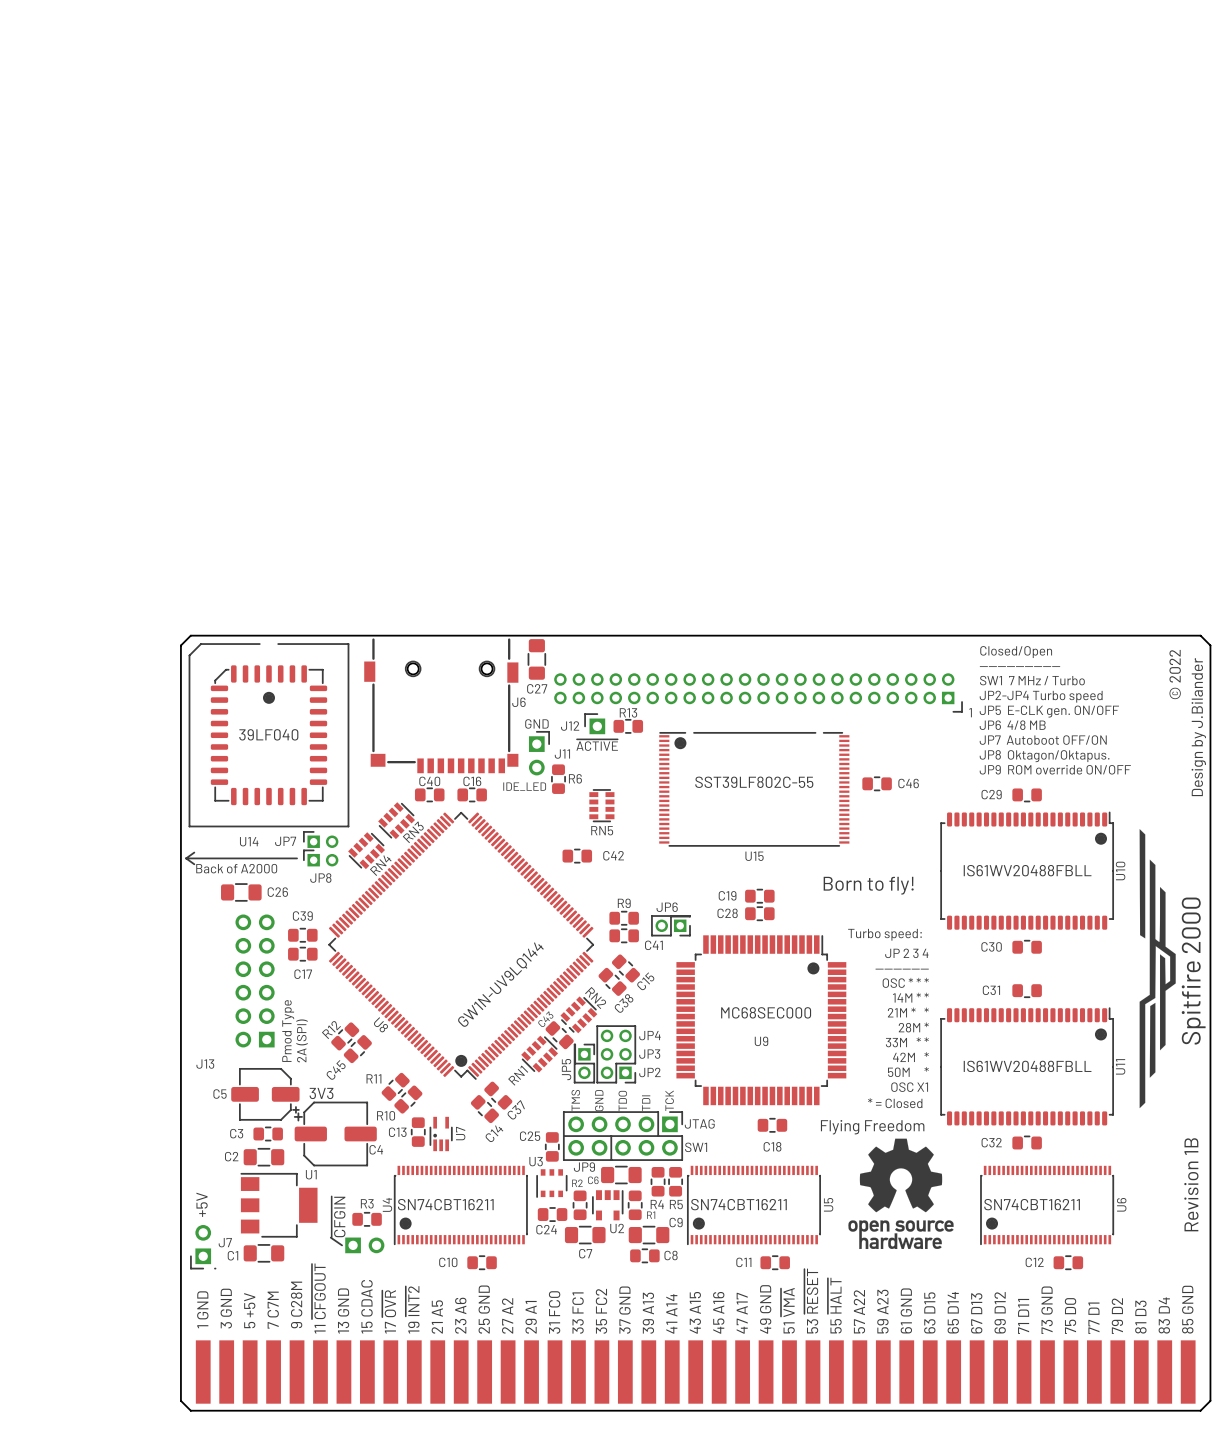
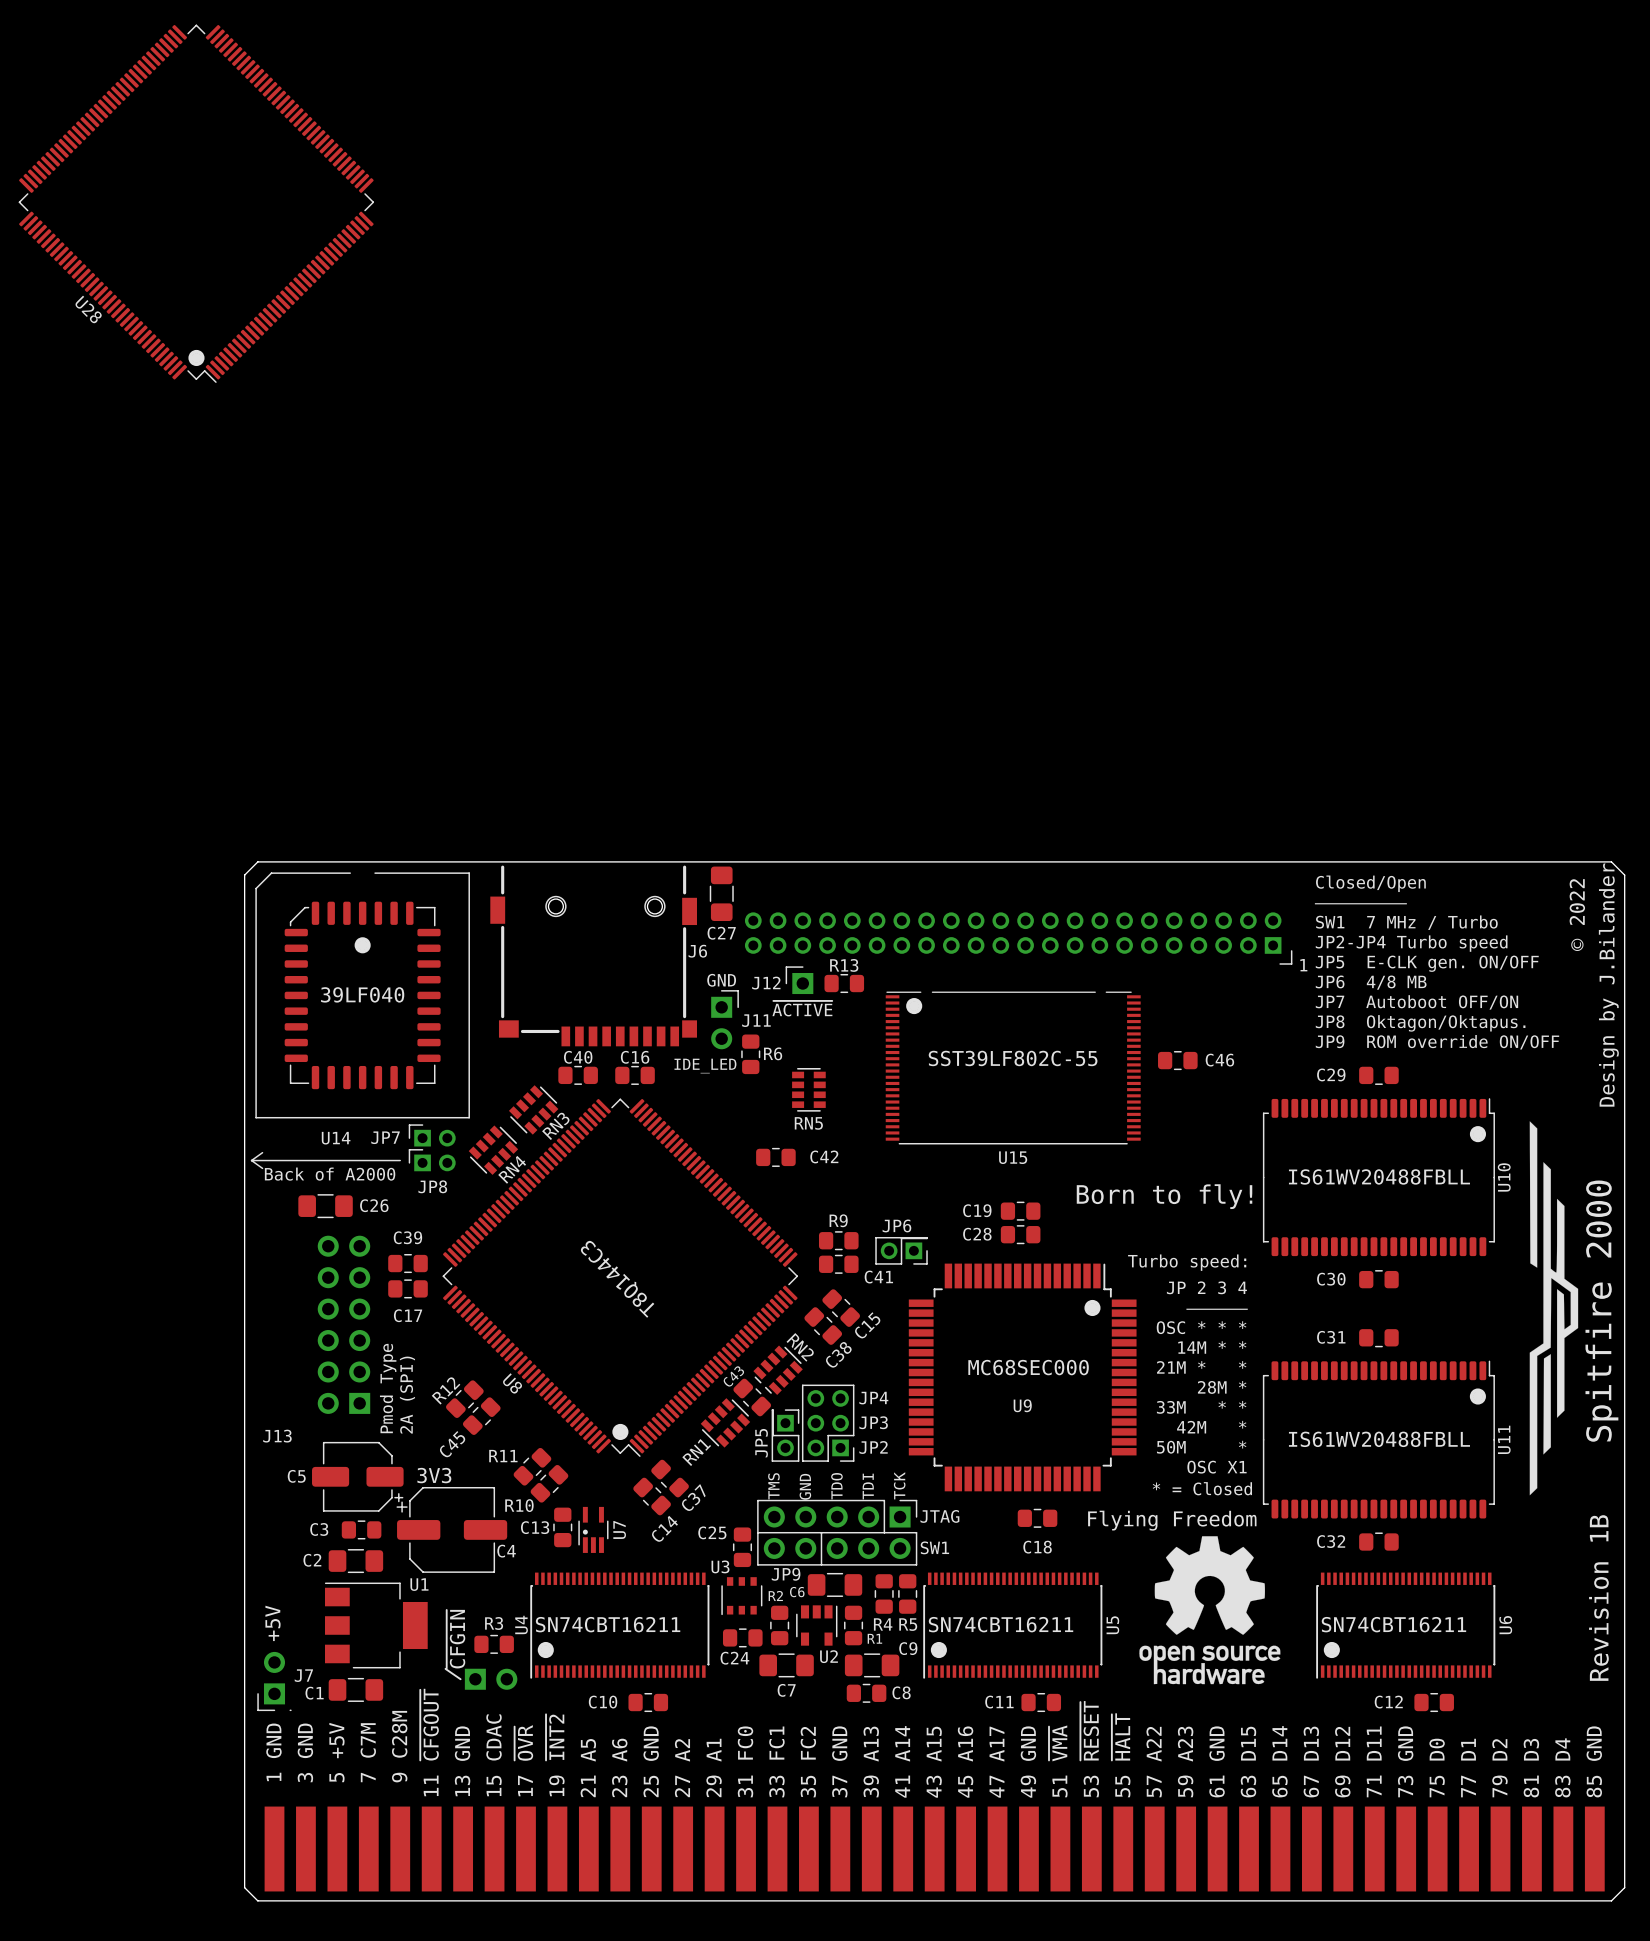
U28: none -> (196, 203)
text: none -> T8Q144C3 (617, 1279)
text: GW1N-UV9LQ144 (500, 984) -> none

